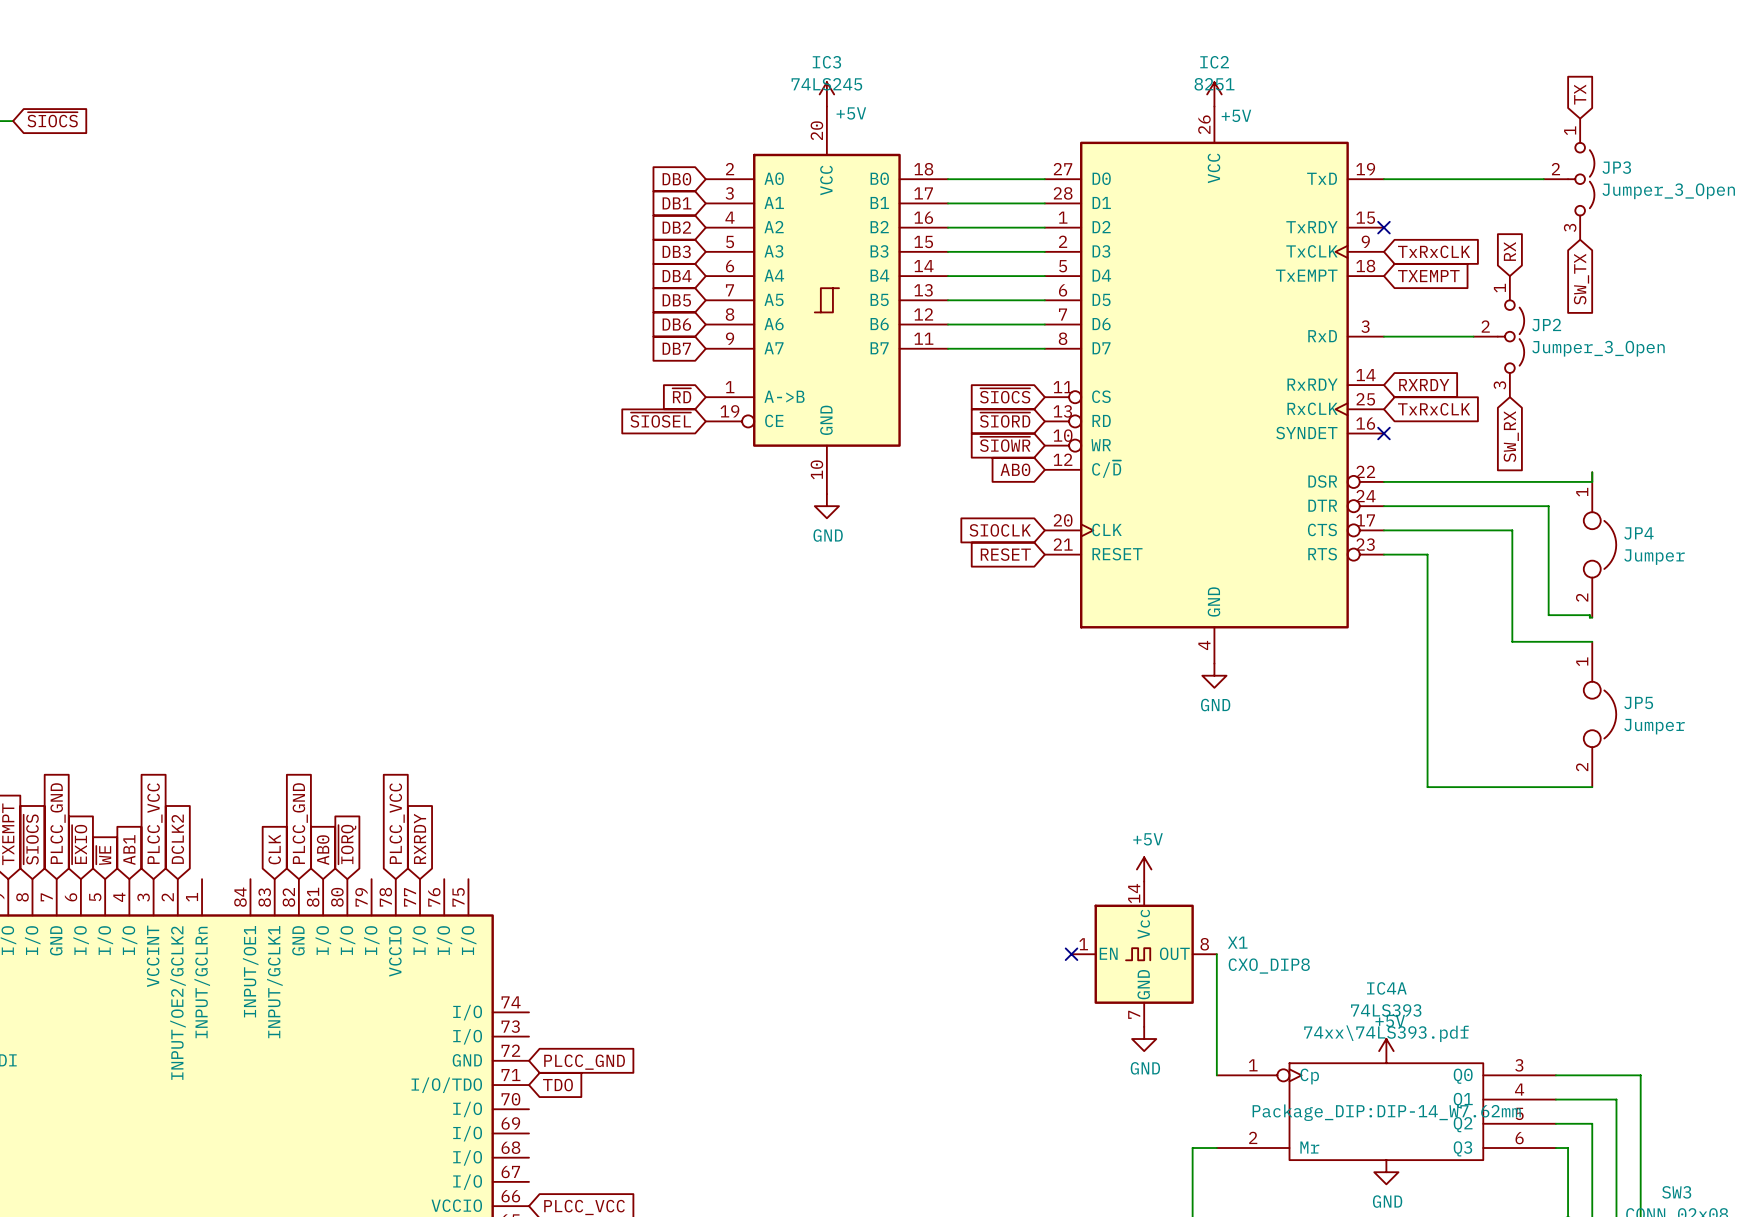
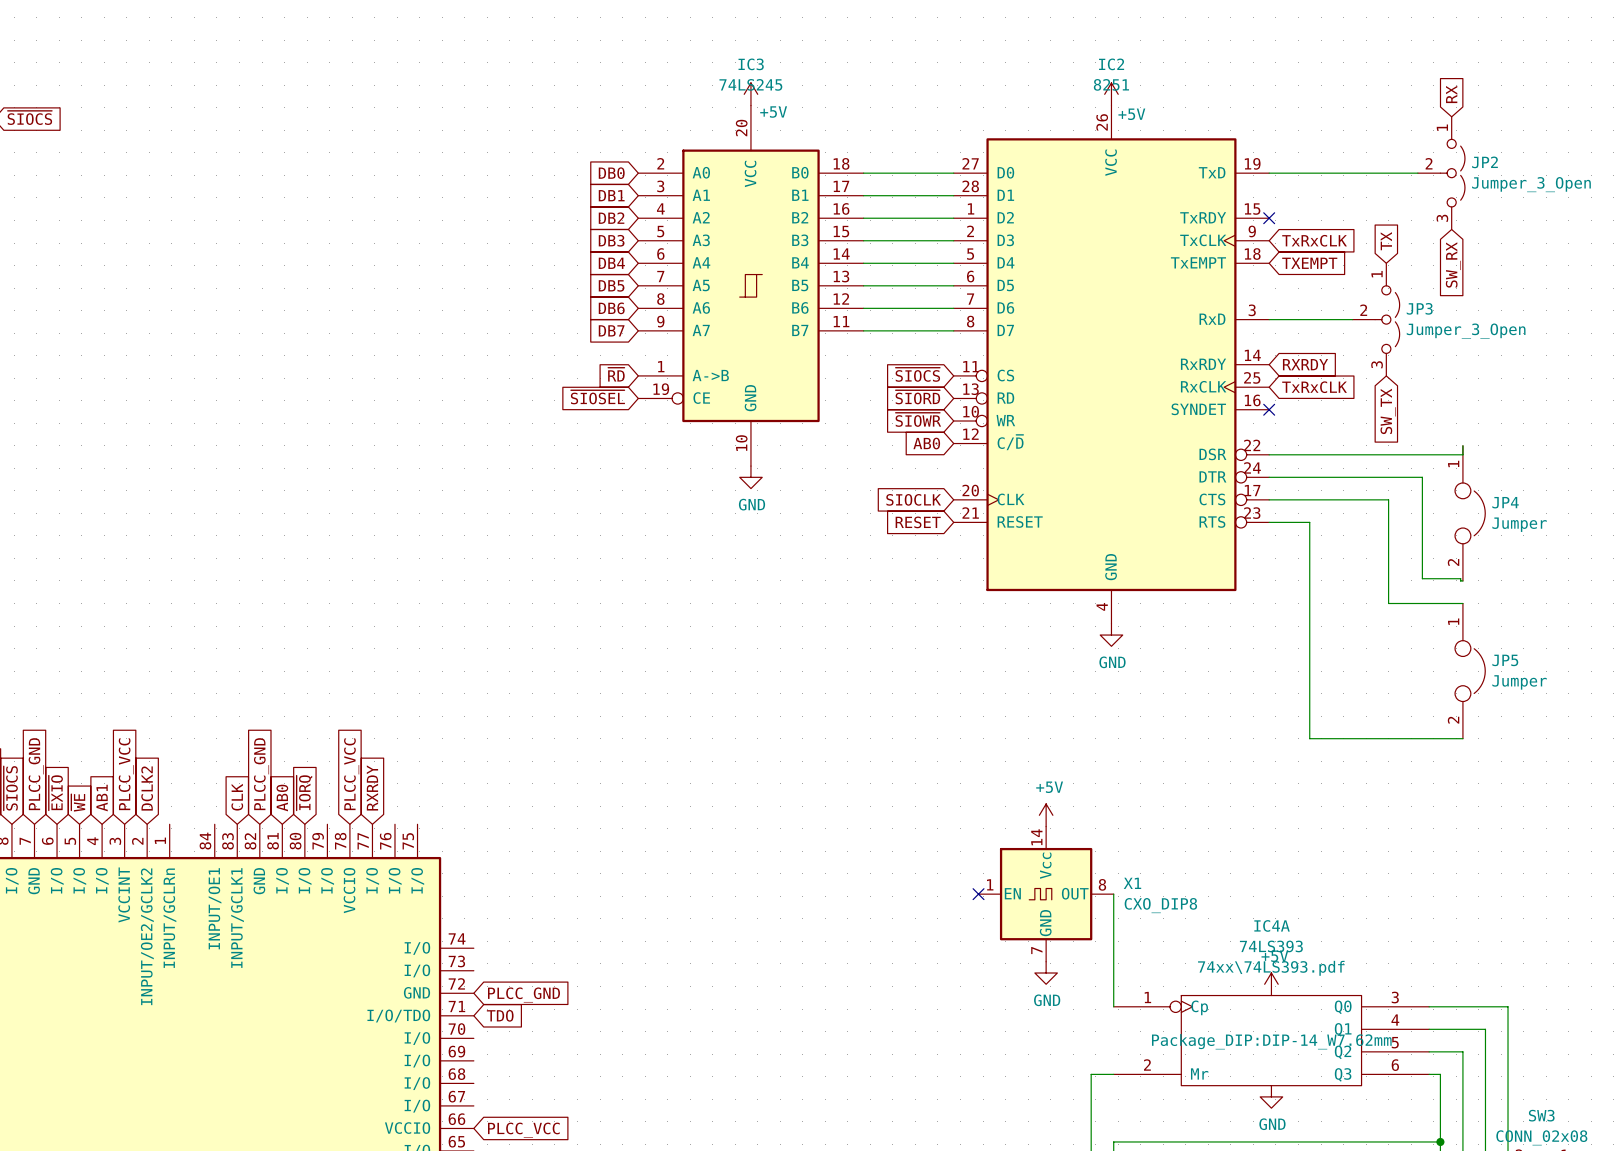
global label: TX (1580, 94) -> RX (1451, 94)
JP3 name: JP3 (1616, 167) -> JP2 (1484, 162)
global label: RX (1509, 251) -> TX (1386, 241)
global label: SW_TX (1581, 279) -> SW_RX (1453, 264)
JP2 name: JP2 (1546, 325) -> JP3 (1419, 308)
global label: SW_RX (1511, 436) -> SW_TX (1388, 411)

